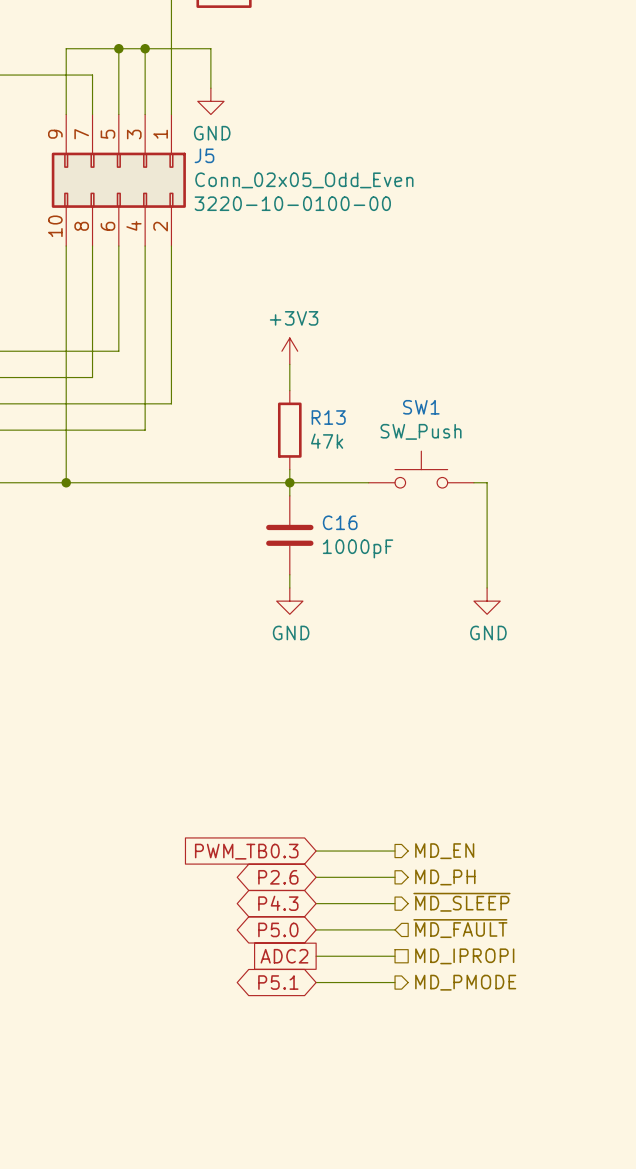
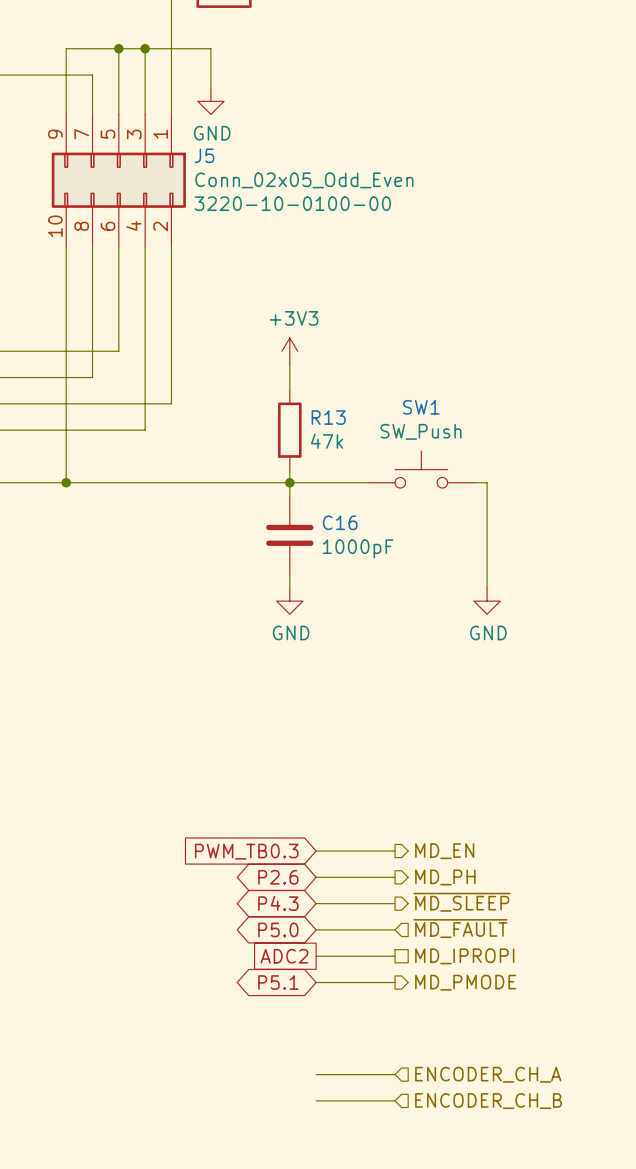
wire: none -> (316, 1074) (395, 1074)
hierarchical label: none -> ENCODER_CH_A (488, 1074)
wire: none -> (316, 1100) (395, 1100)
hierarchical label: none -> ENCODER_CH_B (488, 1101)

